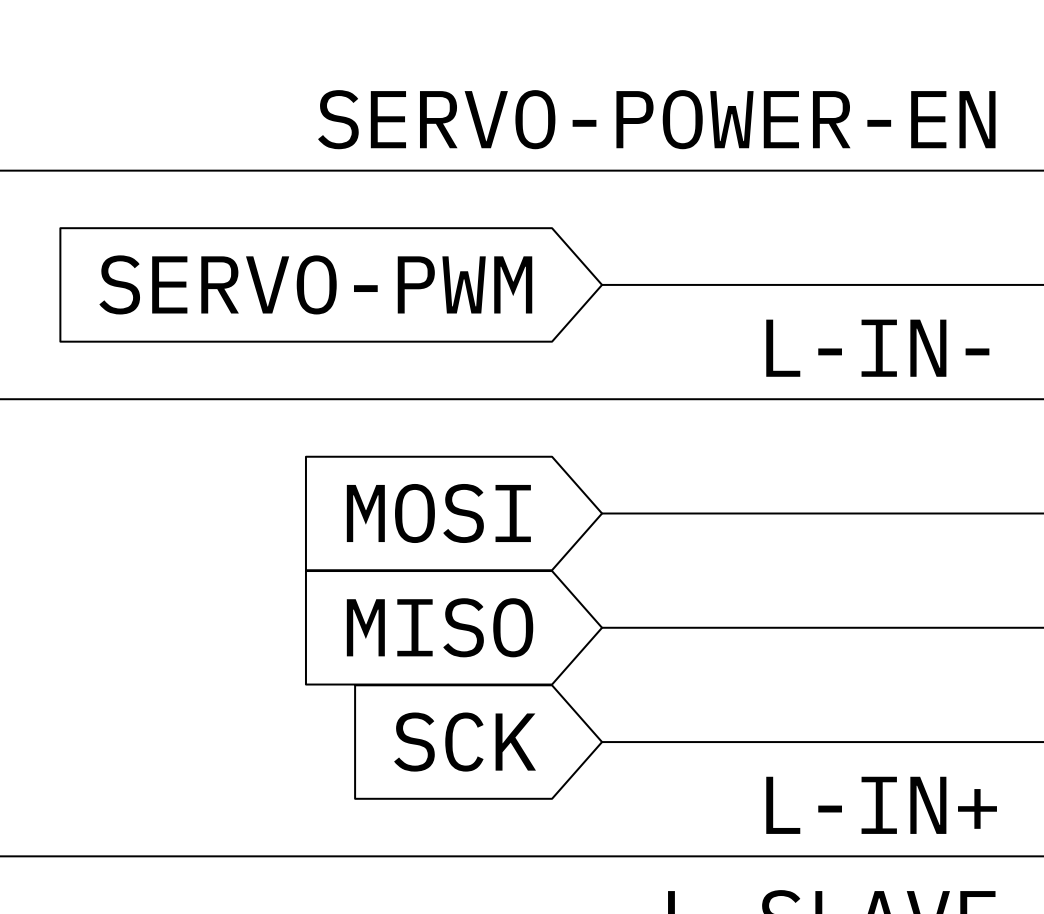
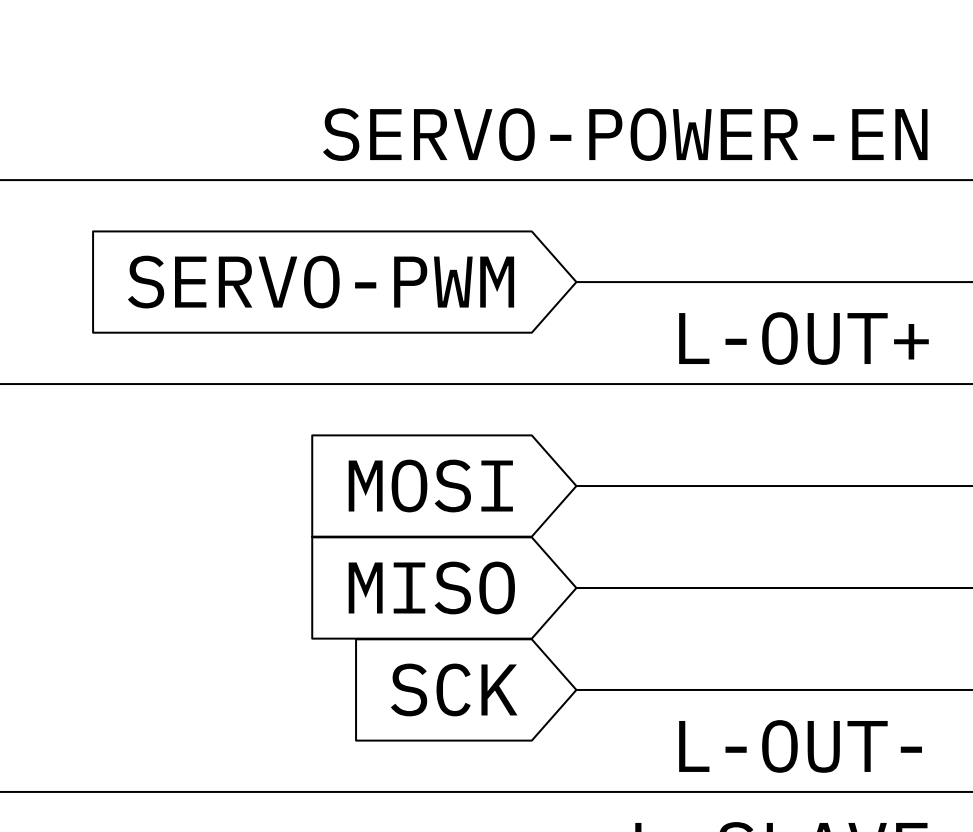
label: L-IN- (877, 348) -> L-OUT+ (803, 338)
label: L-IN+ (881, 805) -> L-OUT- (800, 746)

